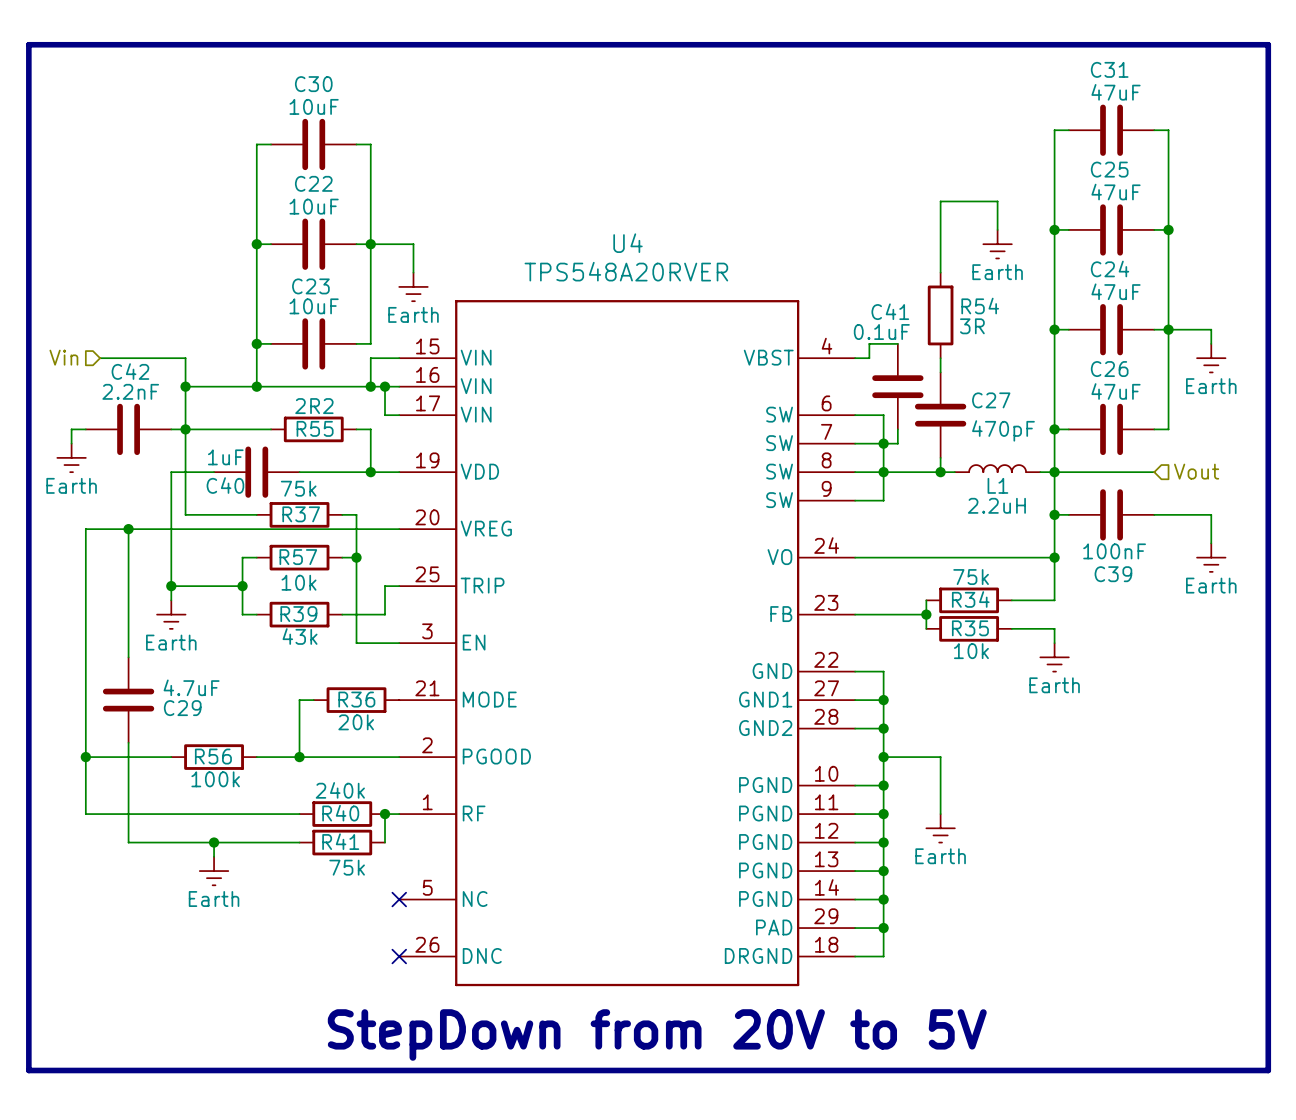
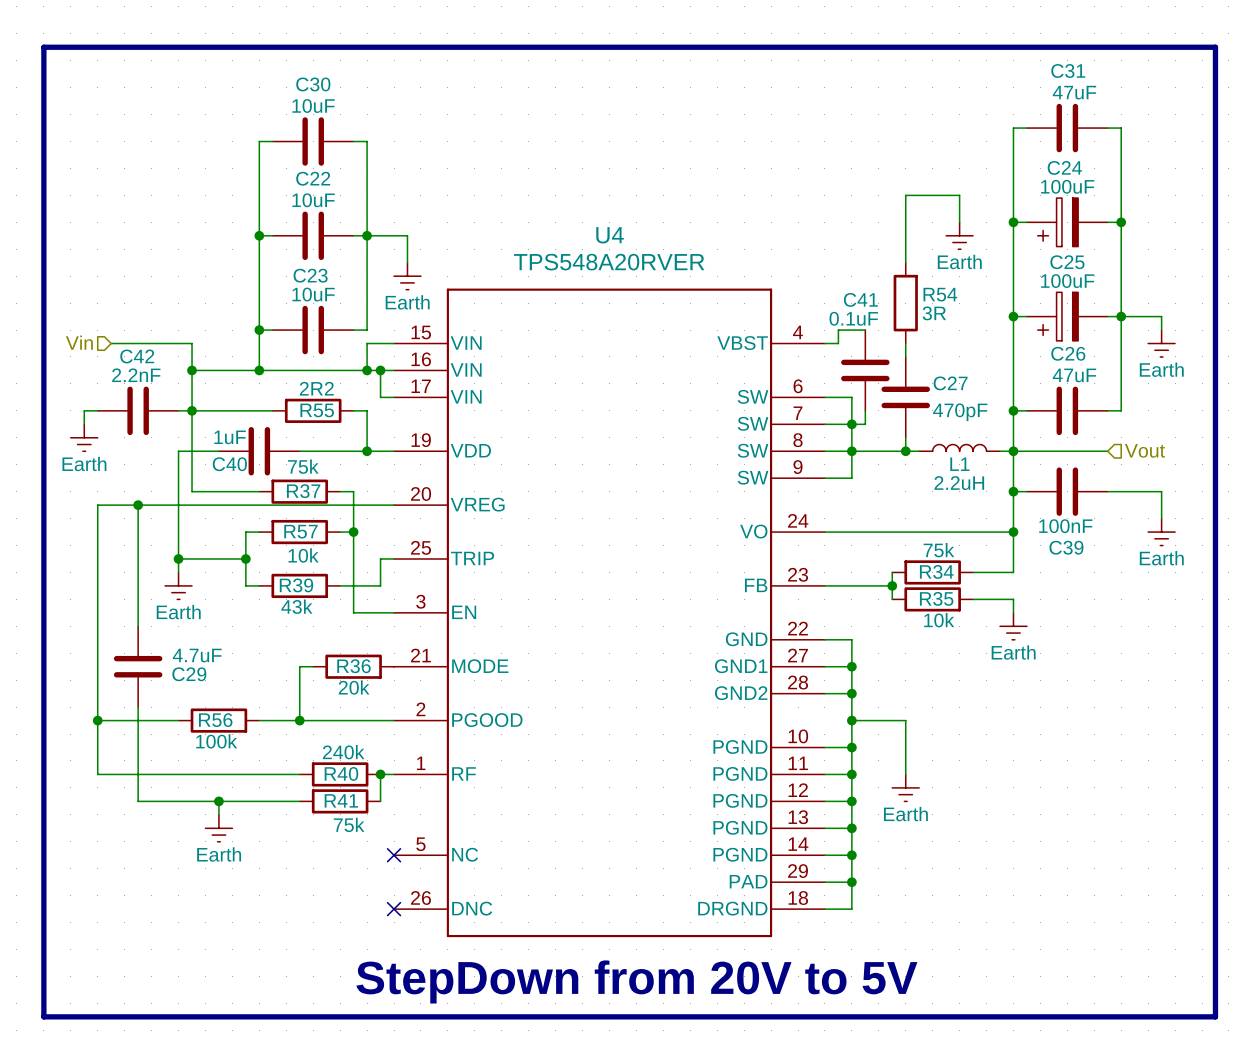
C25 value: 47uF (1116, 192) -> 100uF (1067, 281)
C25 symbol: [1068, 204, 1155, 256] -> [1026, 292, 1108, 341]
C24 value: 47uF (1116, 291) -> 100uF (1067, 186)
C24 symbol: [1068, 304, 1155, 356] -> [1026, 198, 1108, 247]

